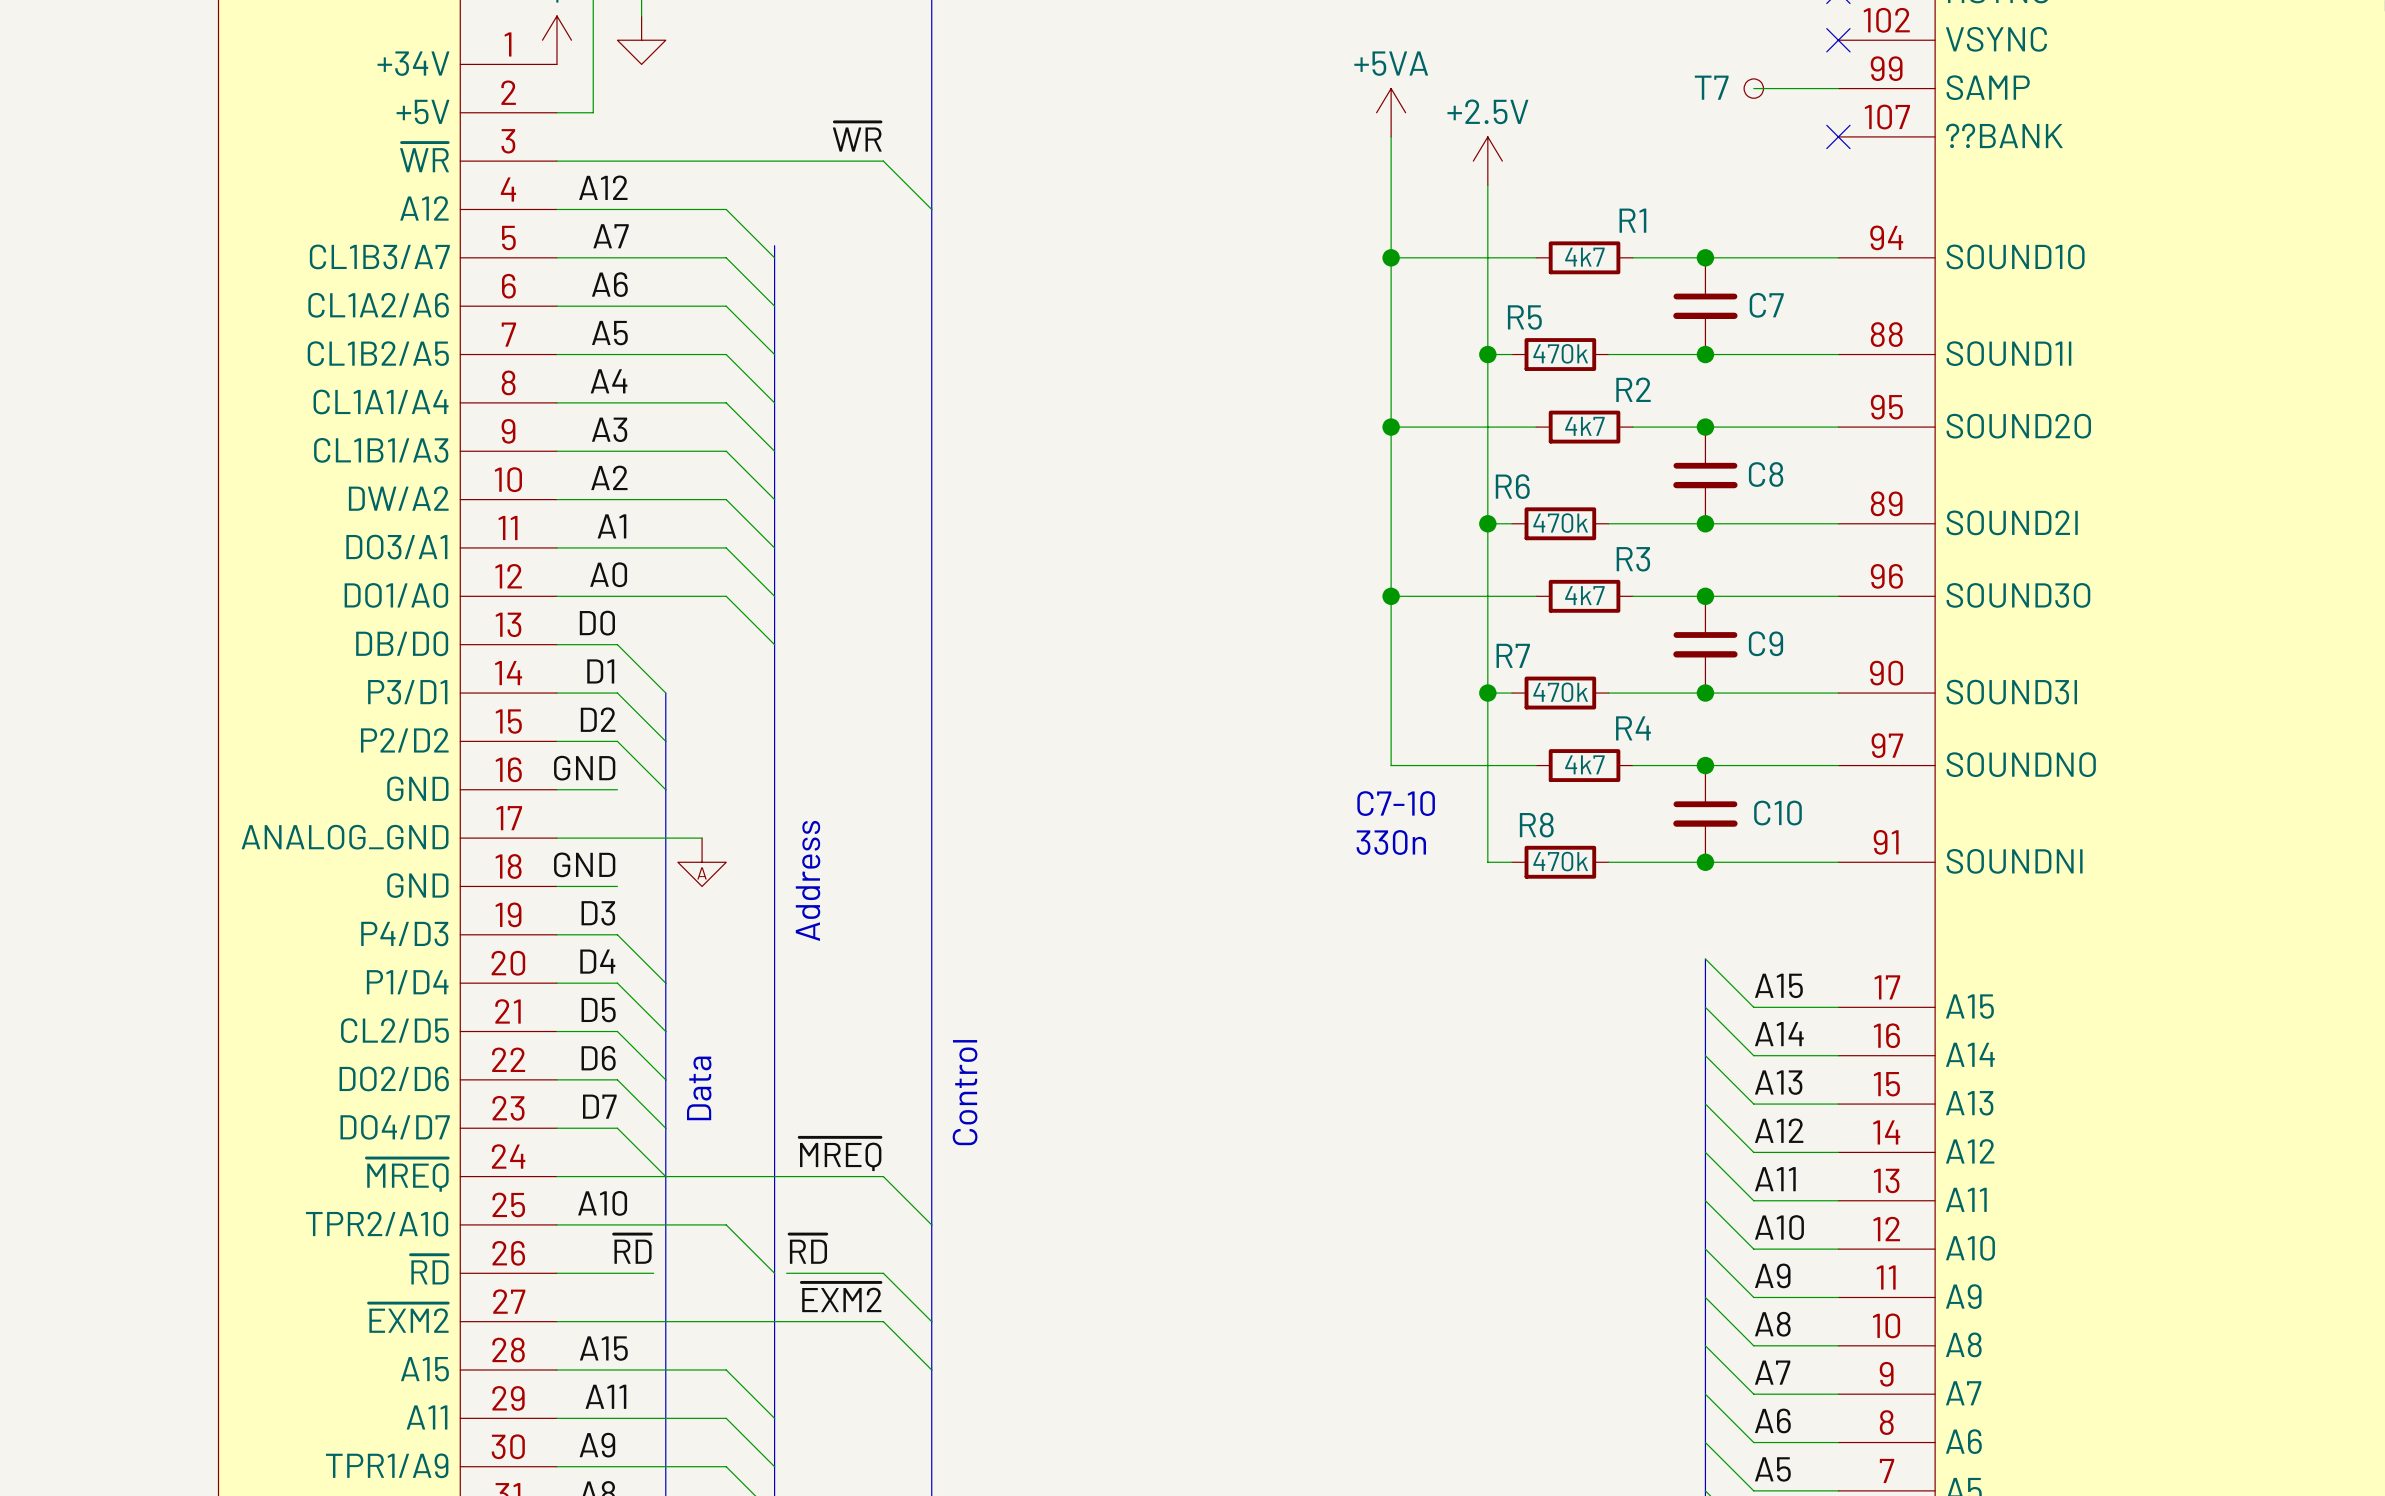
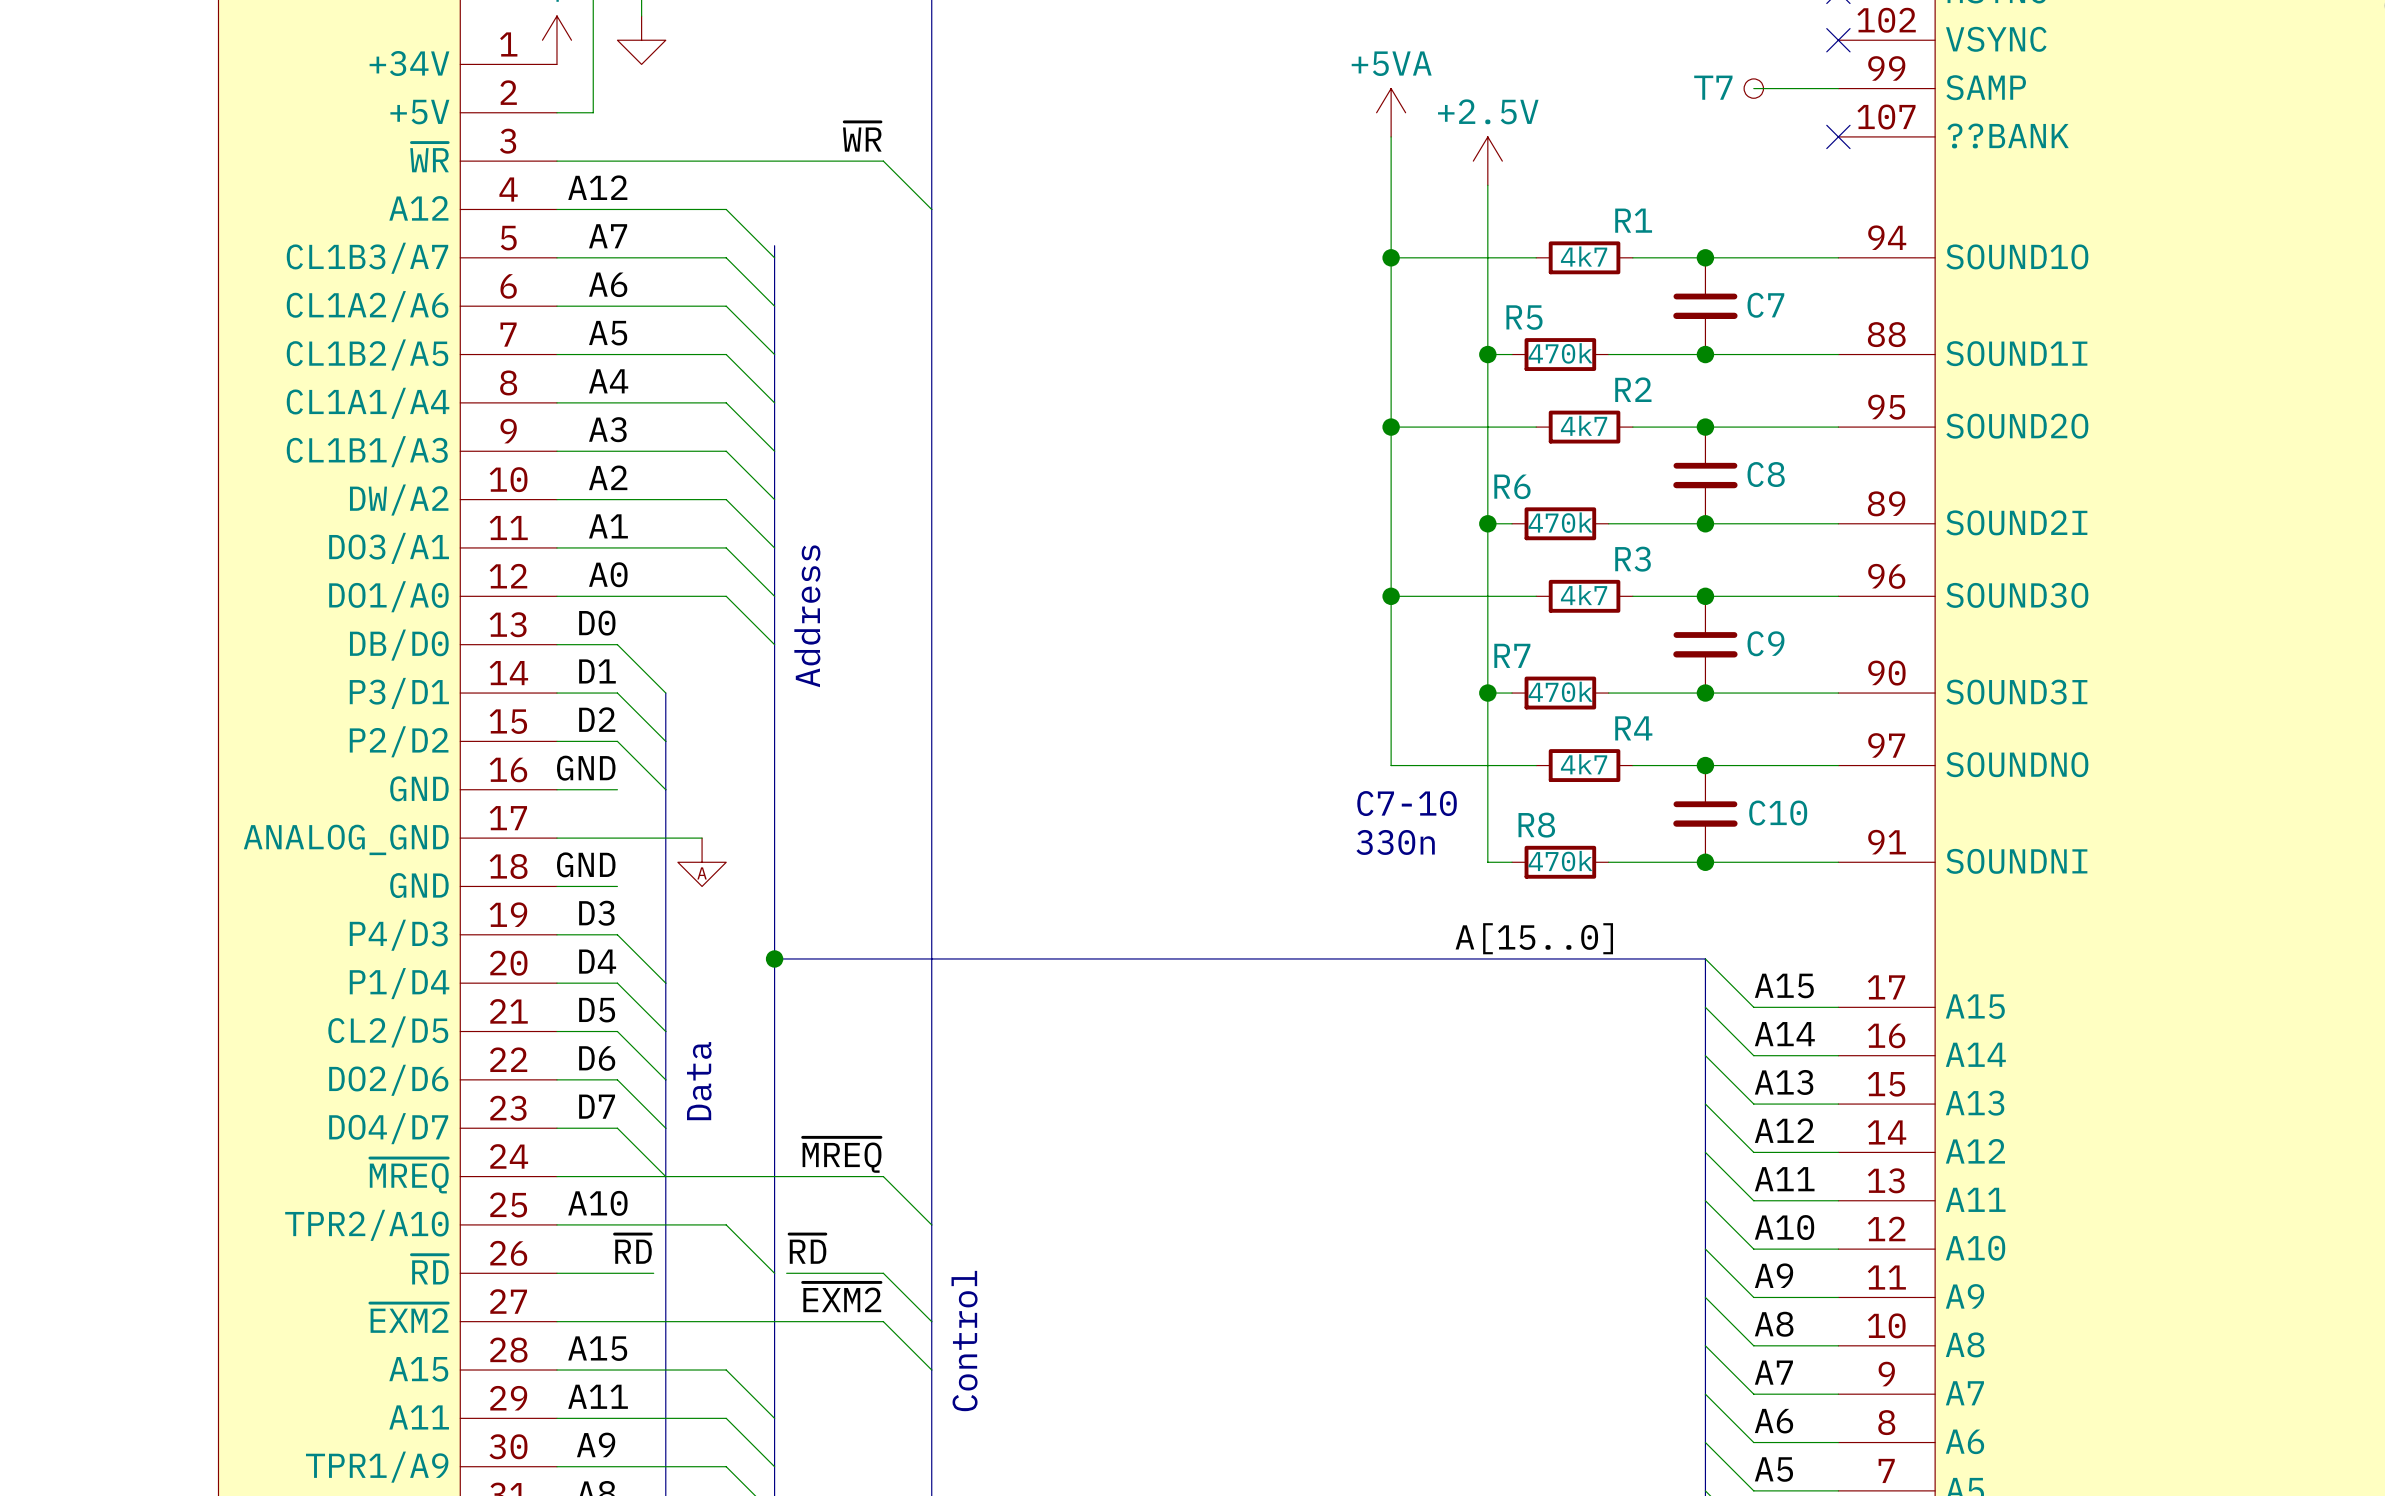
text position: Address (808, 880) -> Address (807, 616)
label: none -> A[15..0] (1534, 938)
bus: none -> (774, 958) (1705, 958)
junction: none -> (774, 958)
text position: Control (965, 1092) -> Control (964, 1341)

